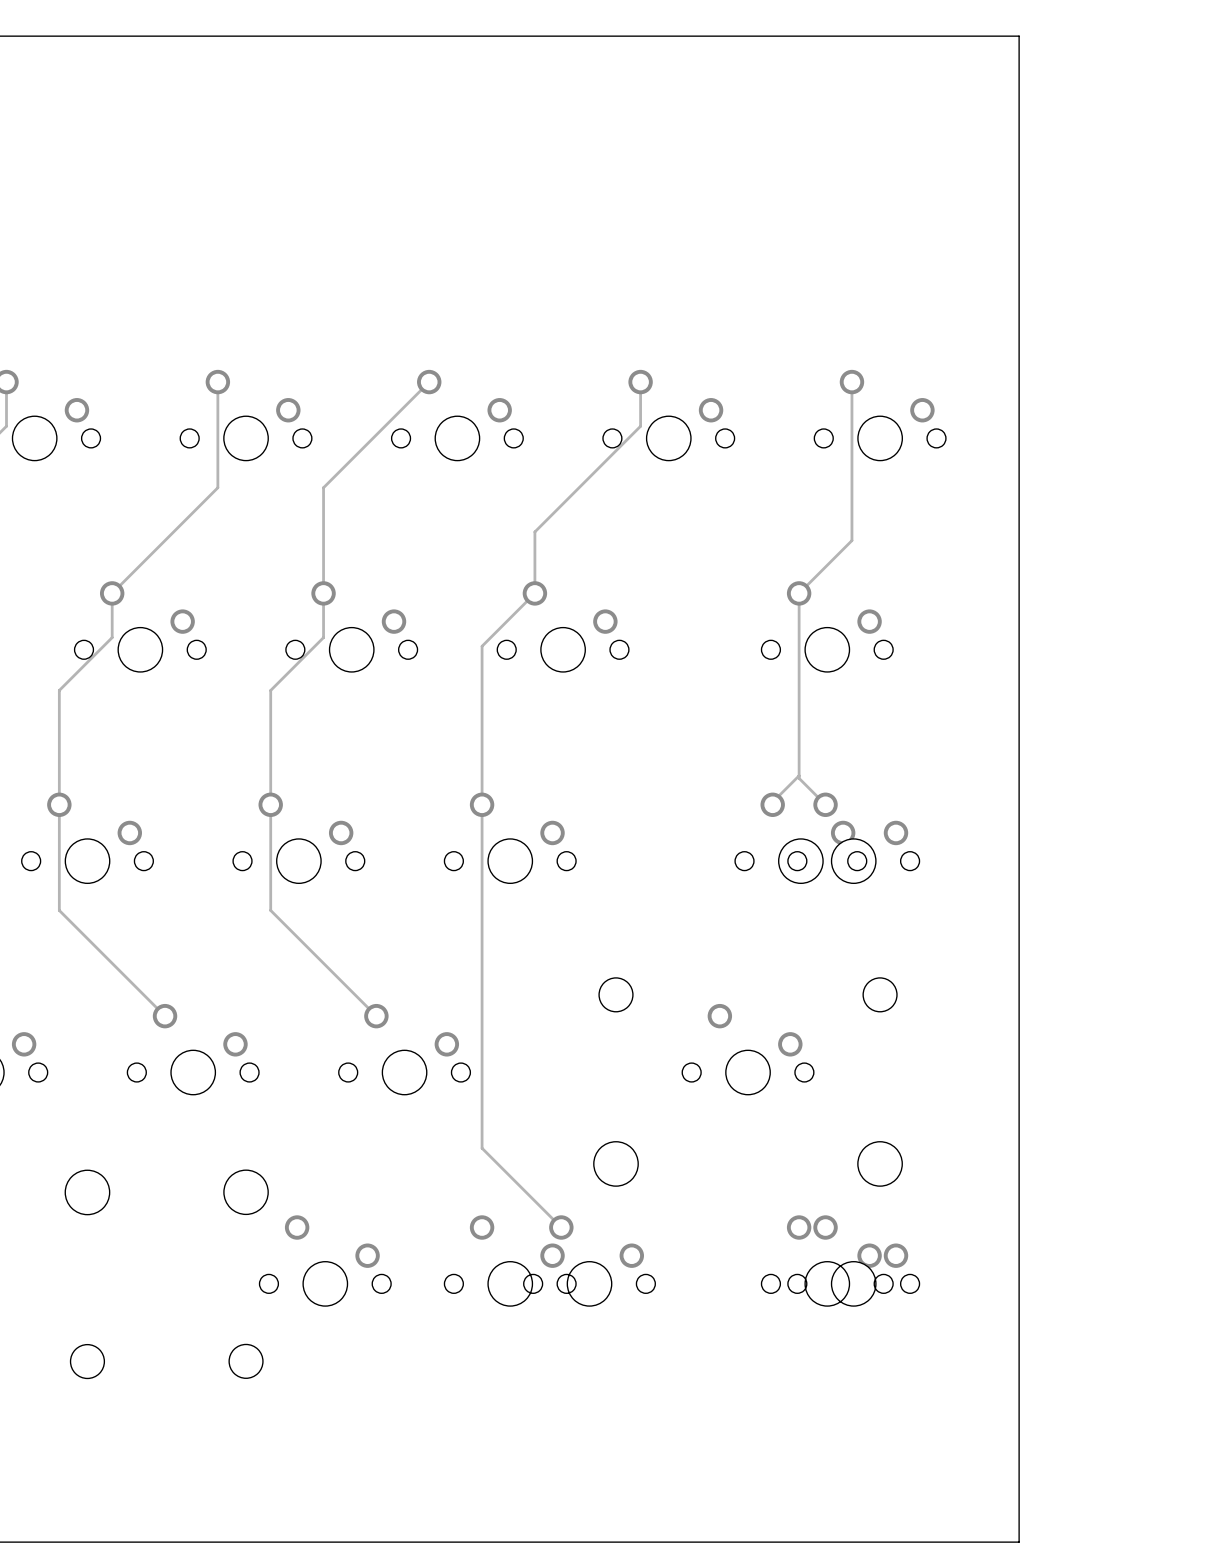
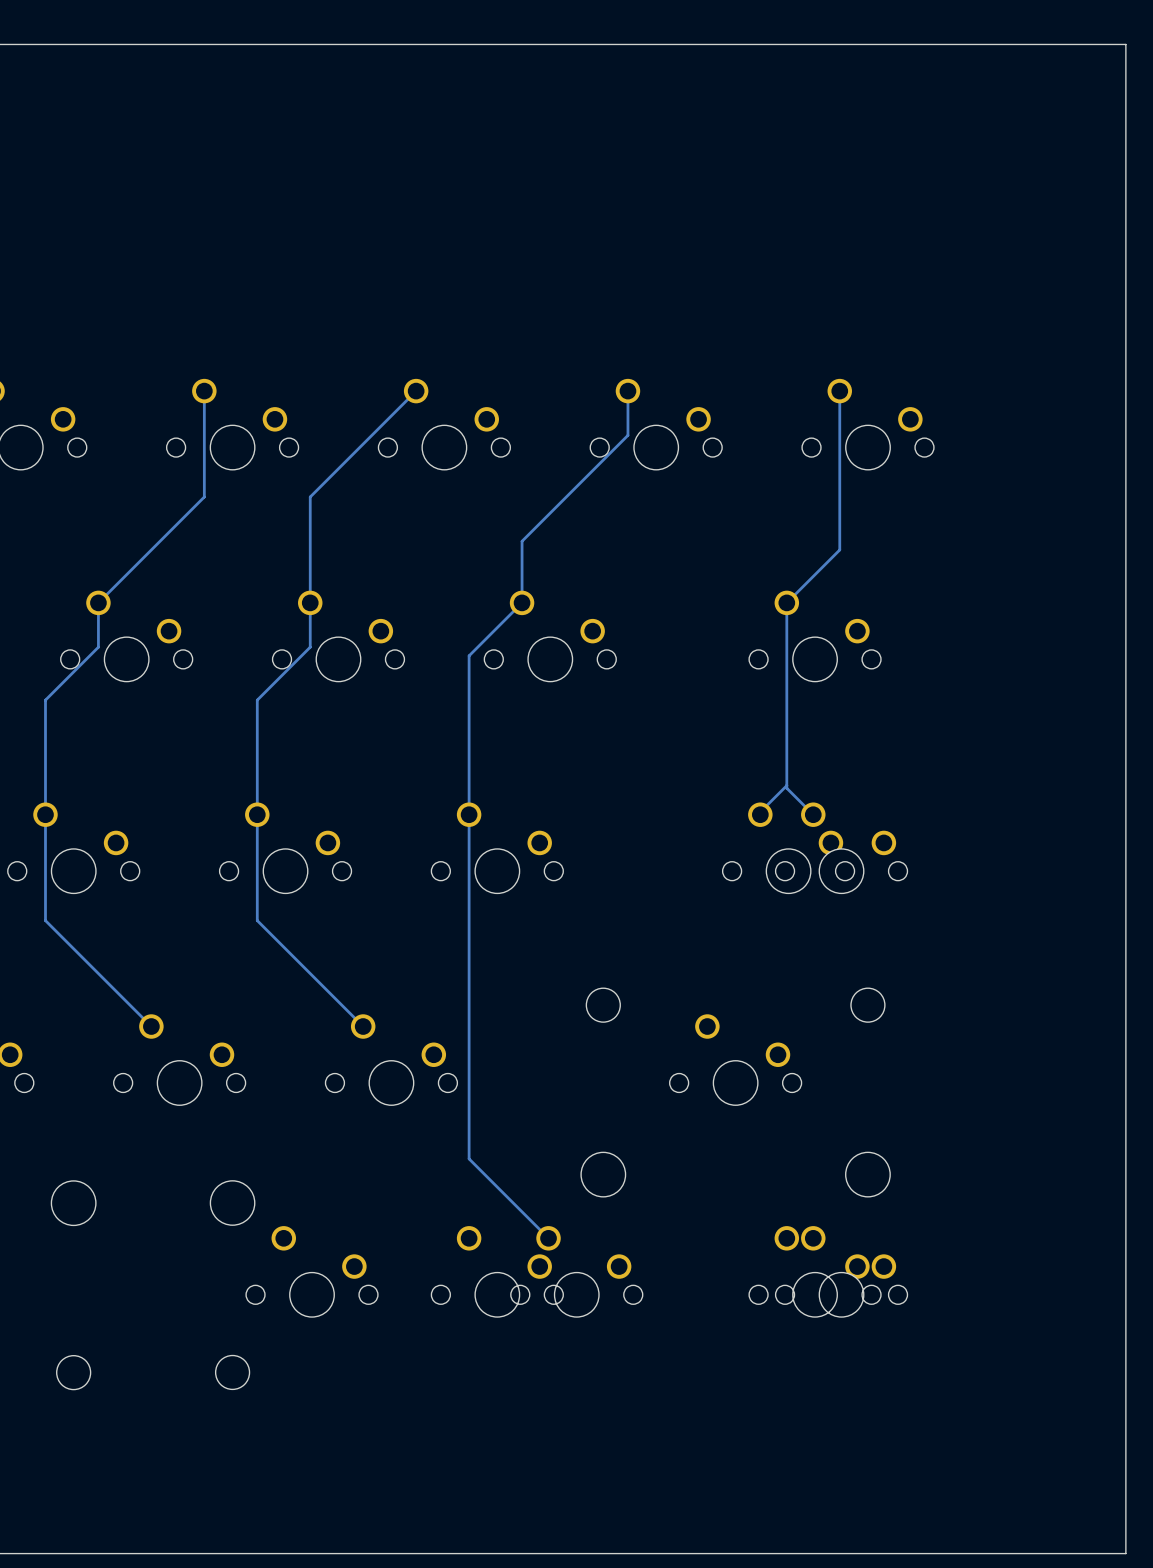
board edge: (1019, 36) (1019, 1542) -> (1007, 44) (1125, 44) (1125, 1553) (1007, 1553)

